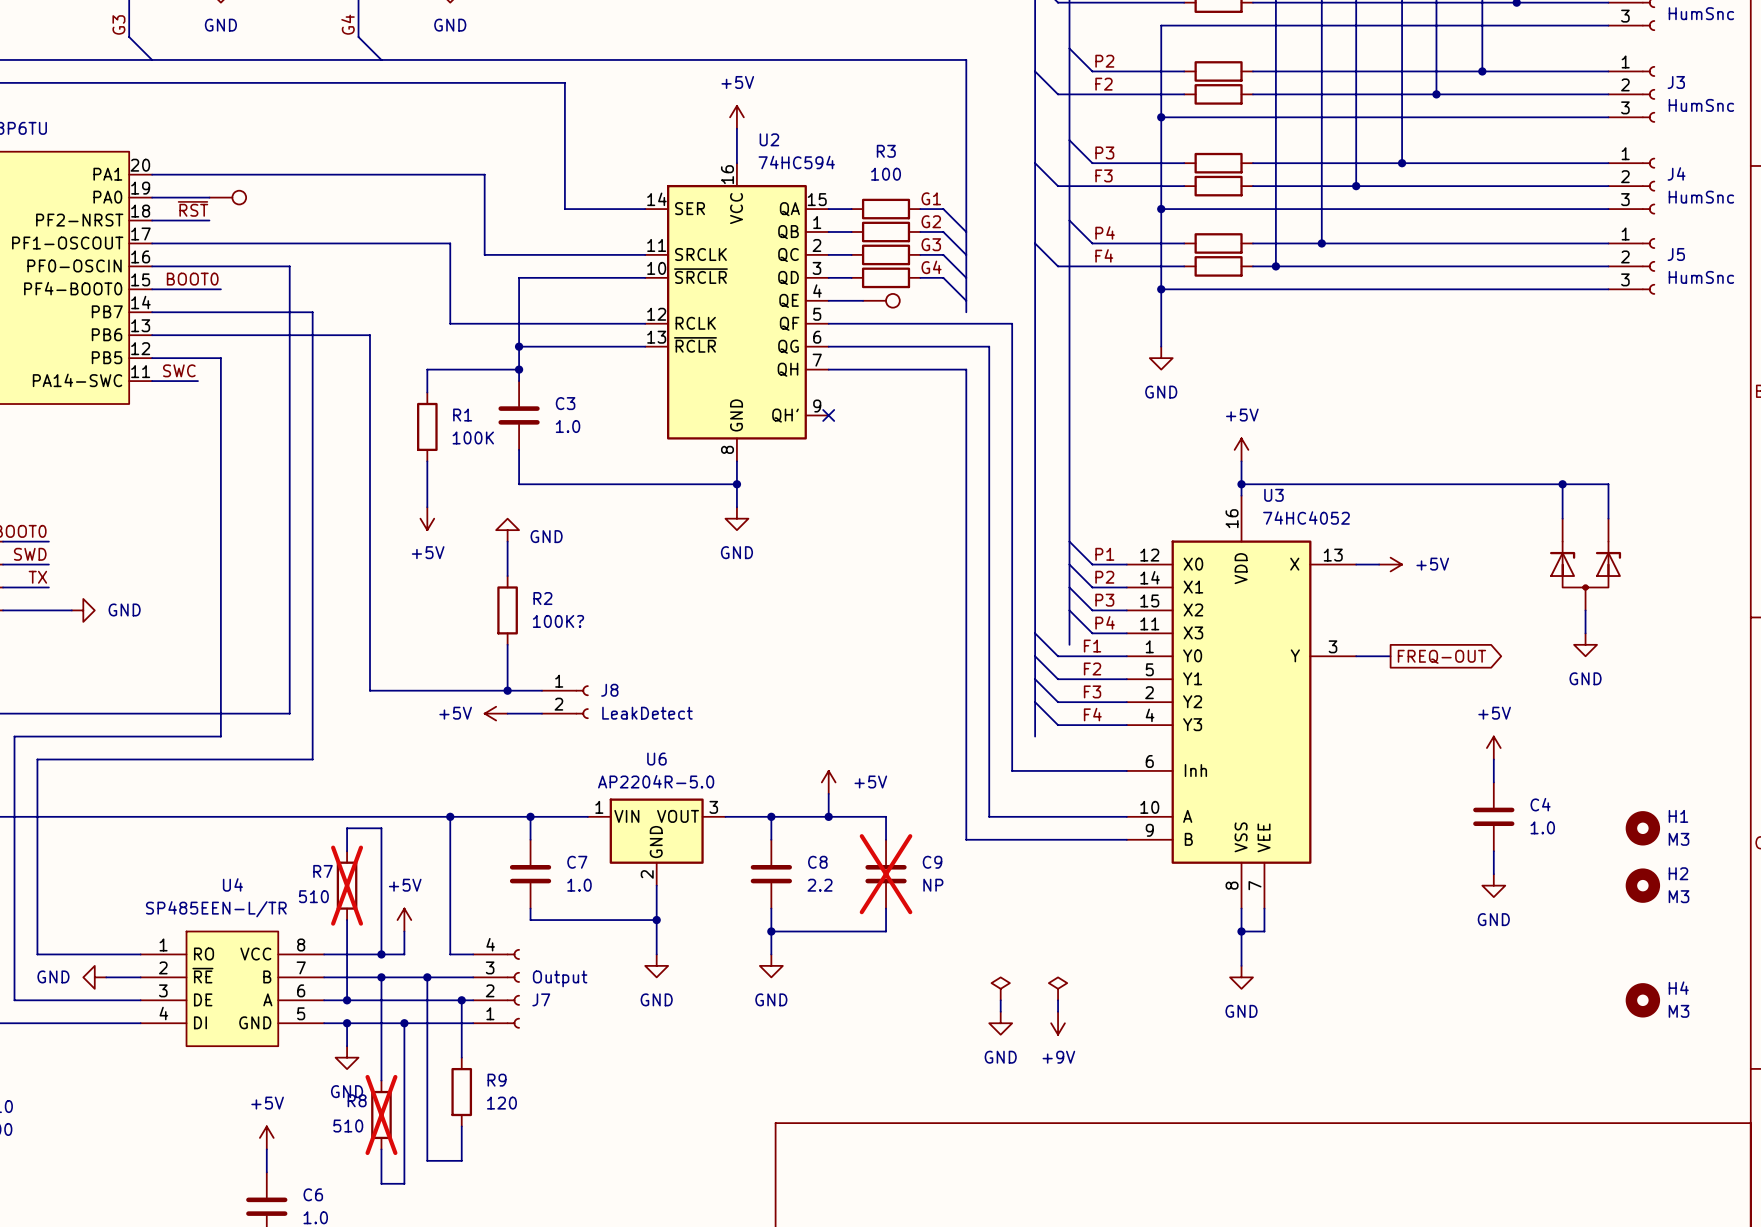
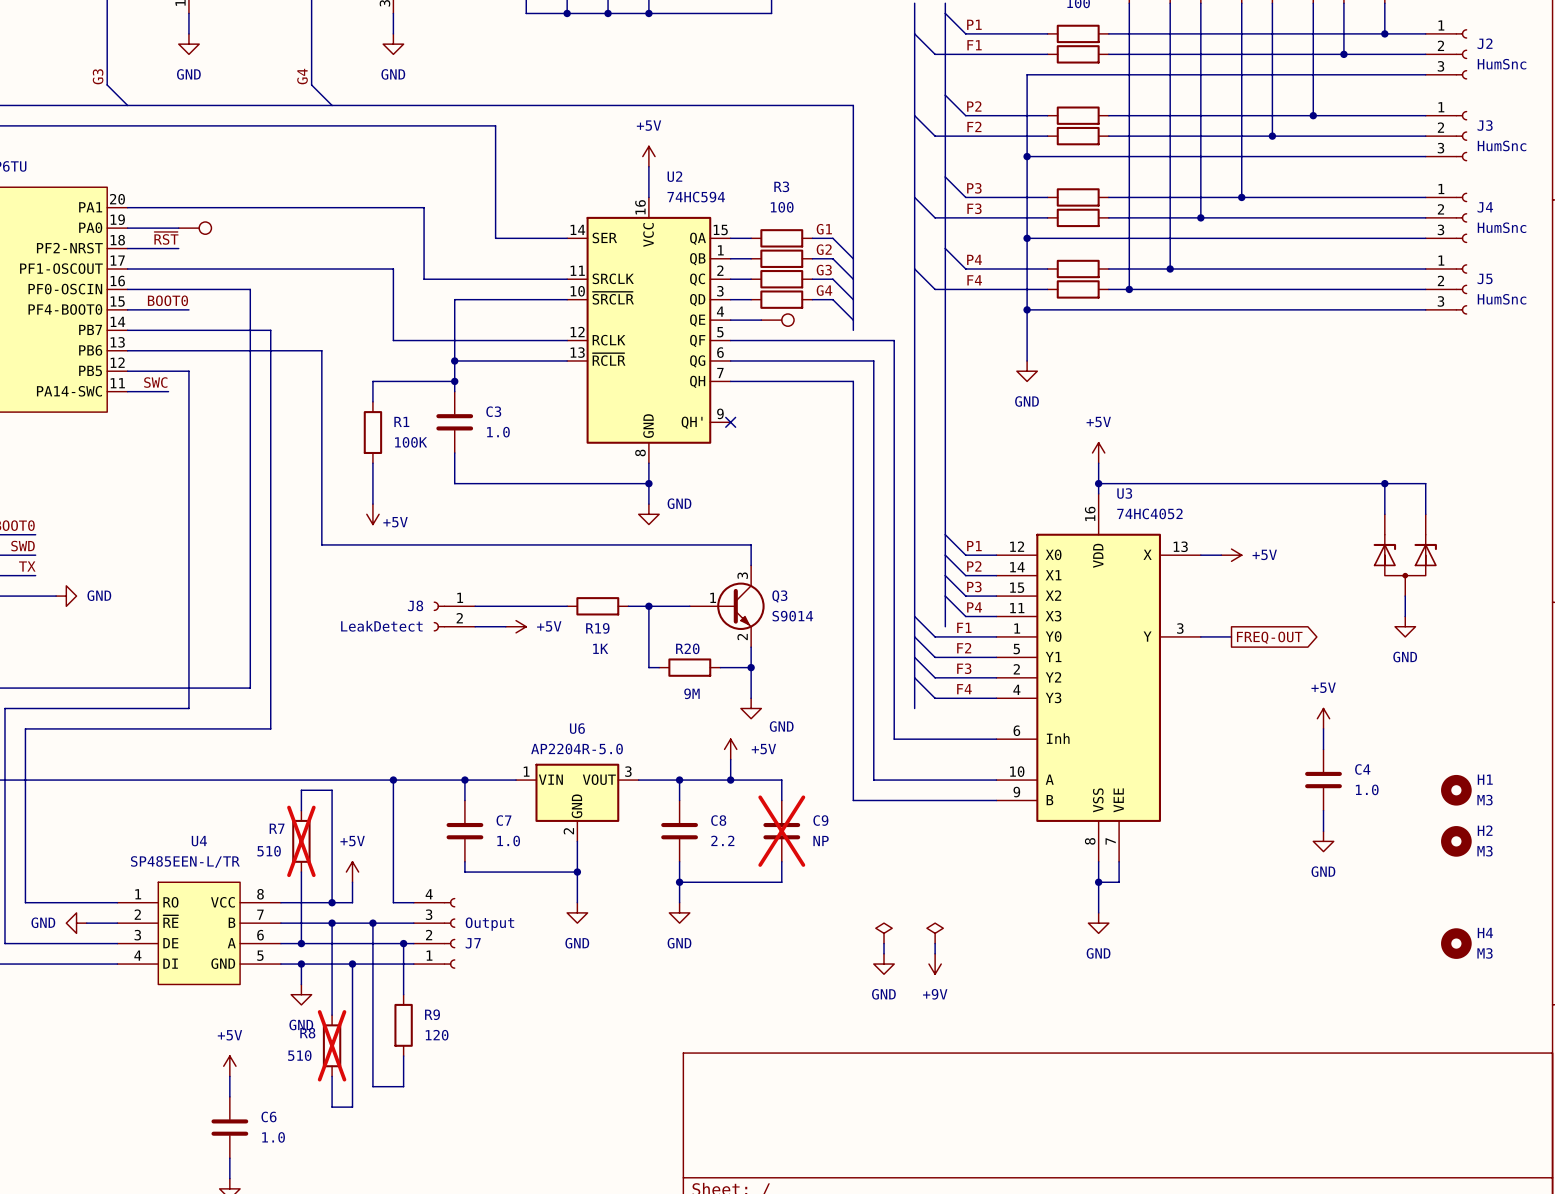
power symbol: GND (507, 530) -> none
wire: (507, 541) (507, 576) -> none
power symbol text position: +5V (428, 552) -> +5V (395, 522)
power symbol text position: GND (736, 552) -> GND (679, 503)
wire: (369, 553) (369, 690) (542, 690) -> (321, 544) (751, 544) (751, 565)
R2: 100K? (507, 610) -> none
wire: none -> (475, 606) (567, 606)
R19: none -> 1K (597, 606)
wire: none -> (628, 606) (689, 606)
wire: none -> (648, 606) (648, 667) (659, 667)
junction: none -> (648, 606)
Q3: none -> S9014 (727, 606)
wire: (507, 644) (507, 690) -> none
wire: none -> (751, 647) (751, 698)
junction: (507, 690) -> none
R20: none -> 9M (689, 667)
wire: none -> (720, 667) (751, 667)
junction: none -> (751, 667)
J8 position: (565, 702) -> (454, 616)
J8 flip: as is (582, 702) -> left-right (439, 616)
power symbol rotation: 0° (496, 713) -> 180° (516, 626)
power symbol position: +5V (496, 713) -> +5V (516, 626)
wire: (507, 713) (542, 713) -> (475, 626) (505, 626)
power symbol: none -> GND (751, 708)

